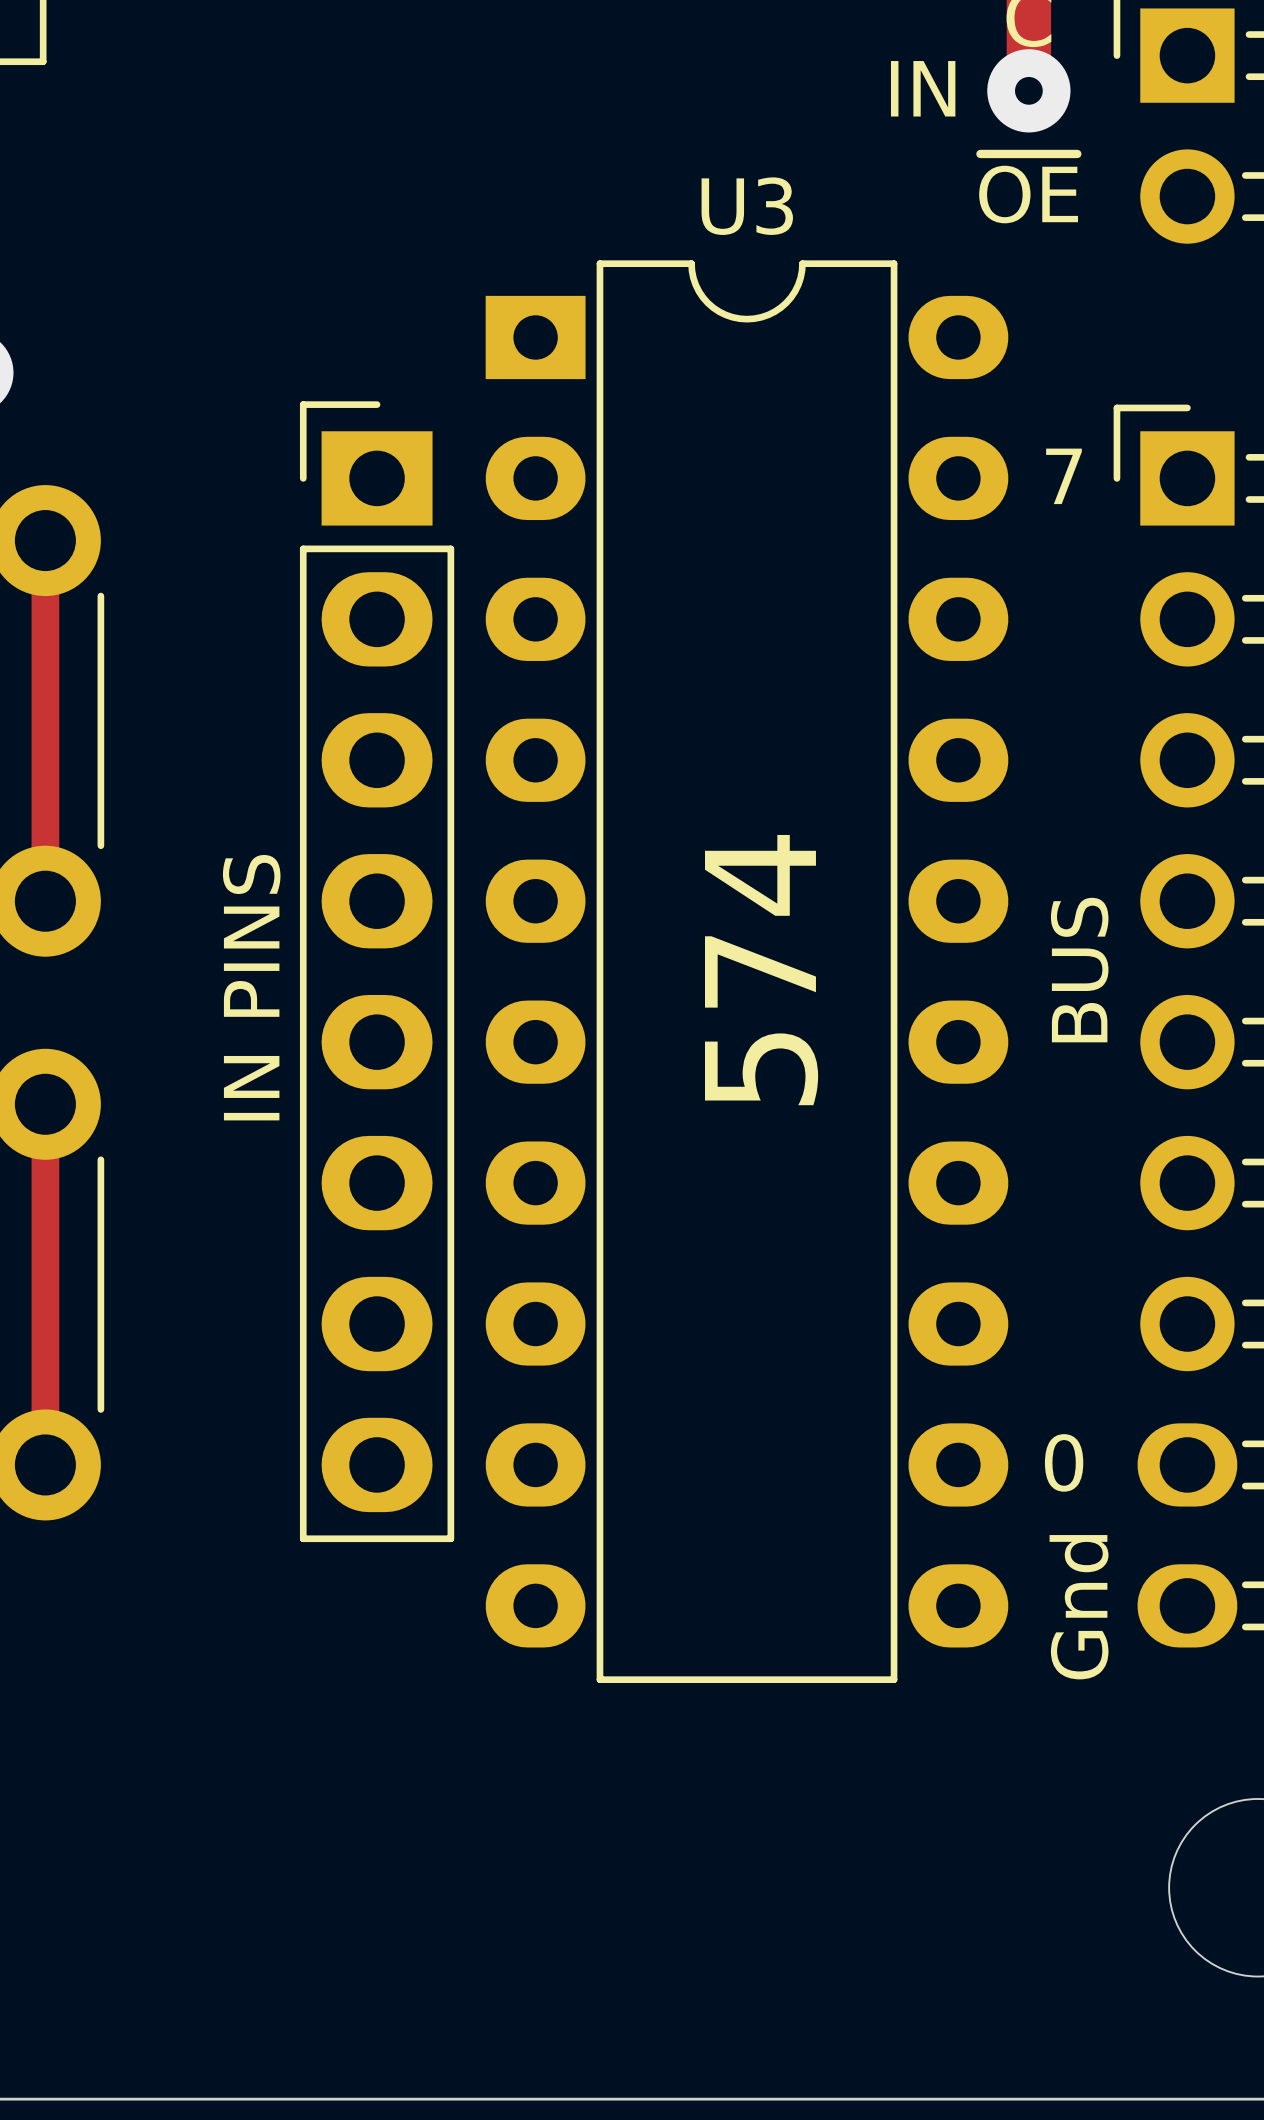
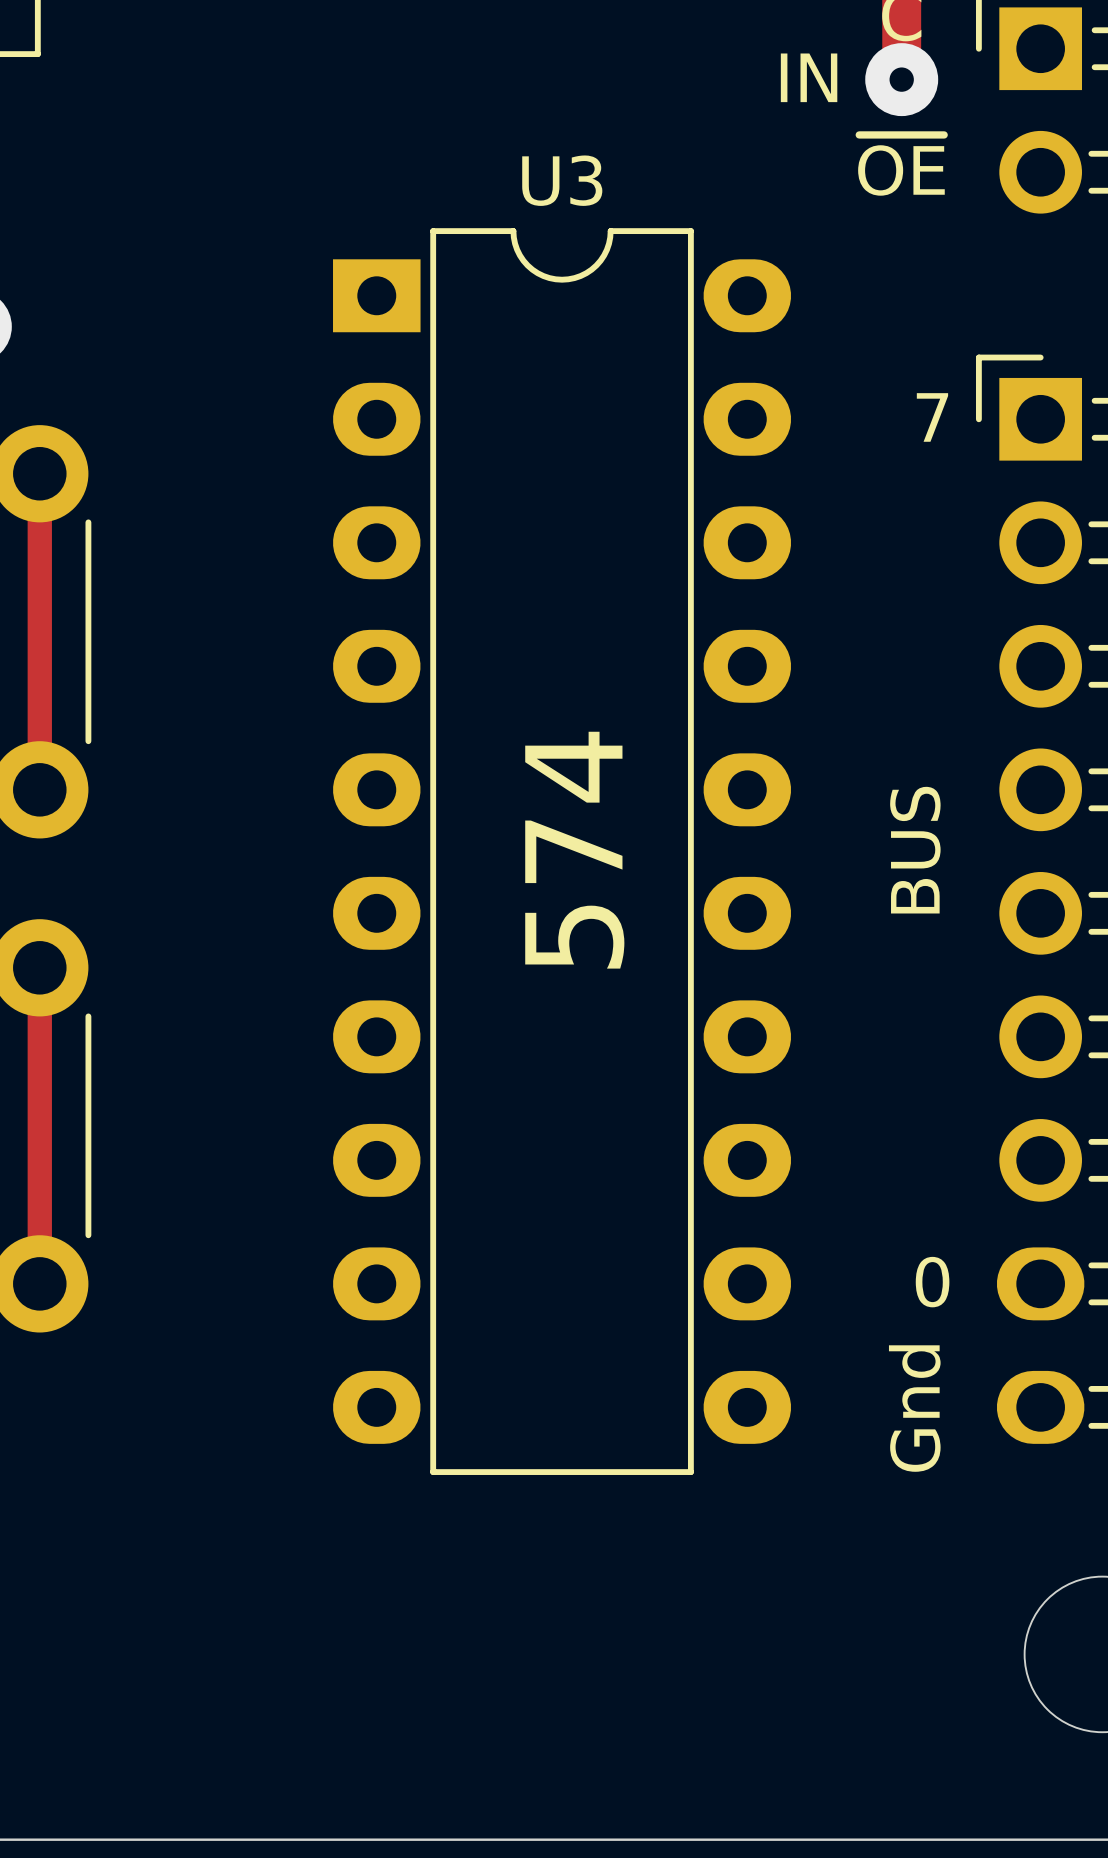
text position: 574 (761, 970) -> 574 (574, 850)
text position: BUS (1079, 970) -> BUS (915, 850)
part: (377, 971) -> none
U3 position: (747, 971) -> (562, 851)
text: IN PINS (251, 987) -> none
text position: Gnd (1079, 1607) -> Gnd (914, 1408)

